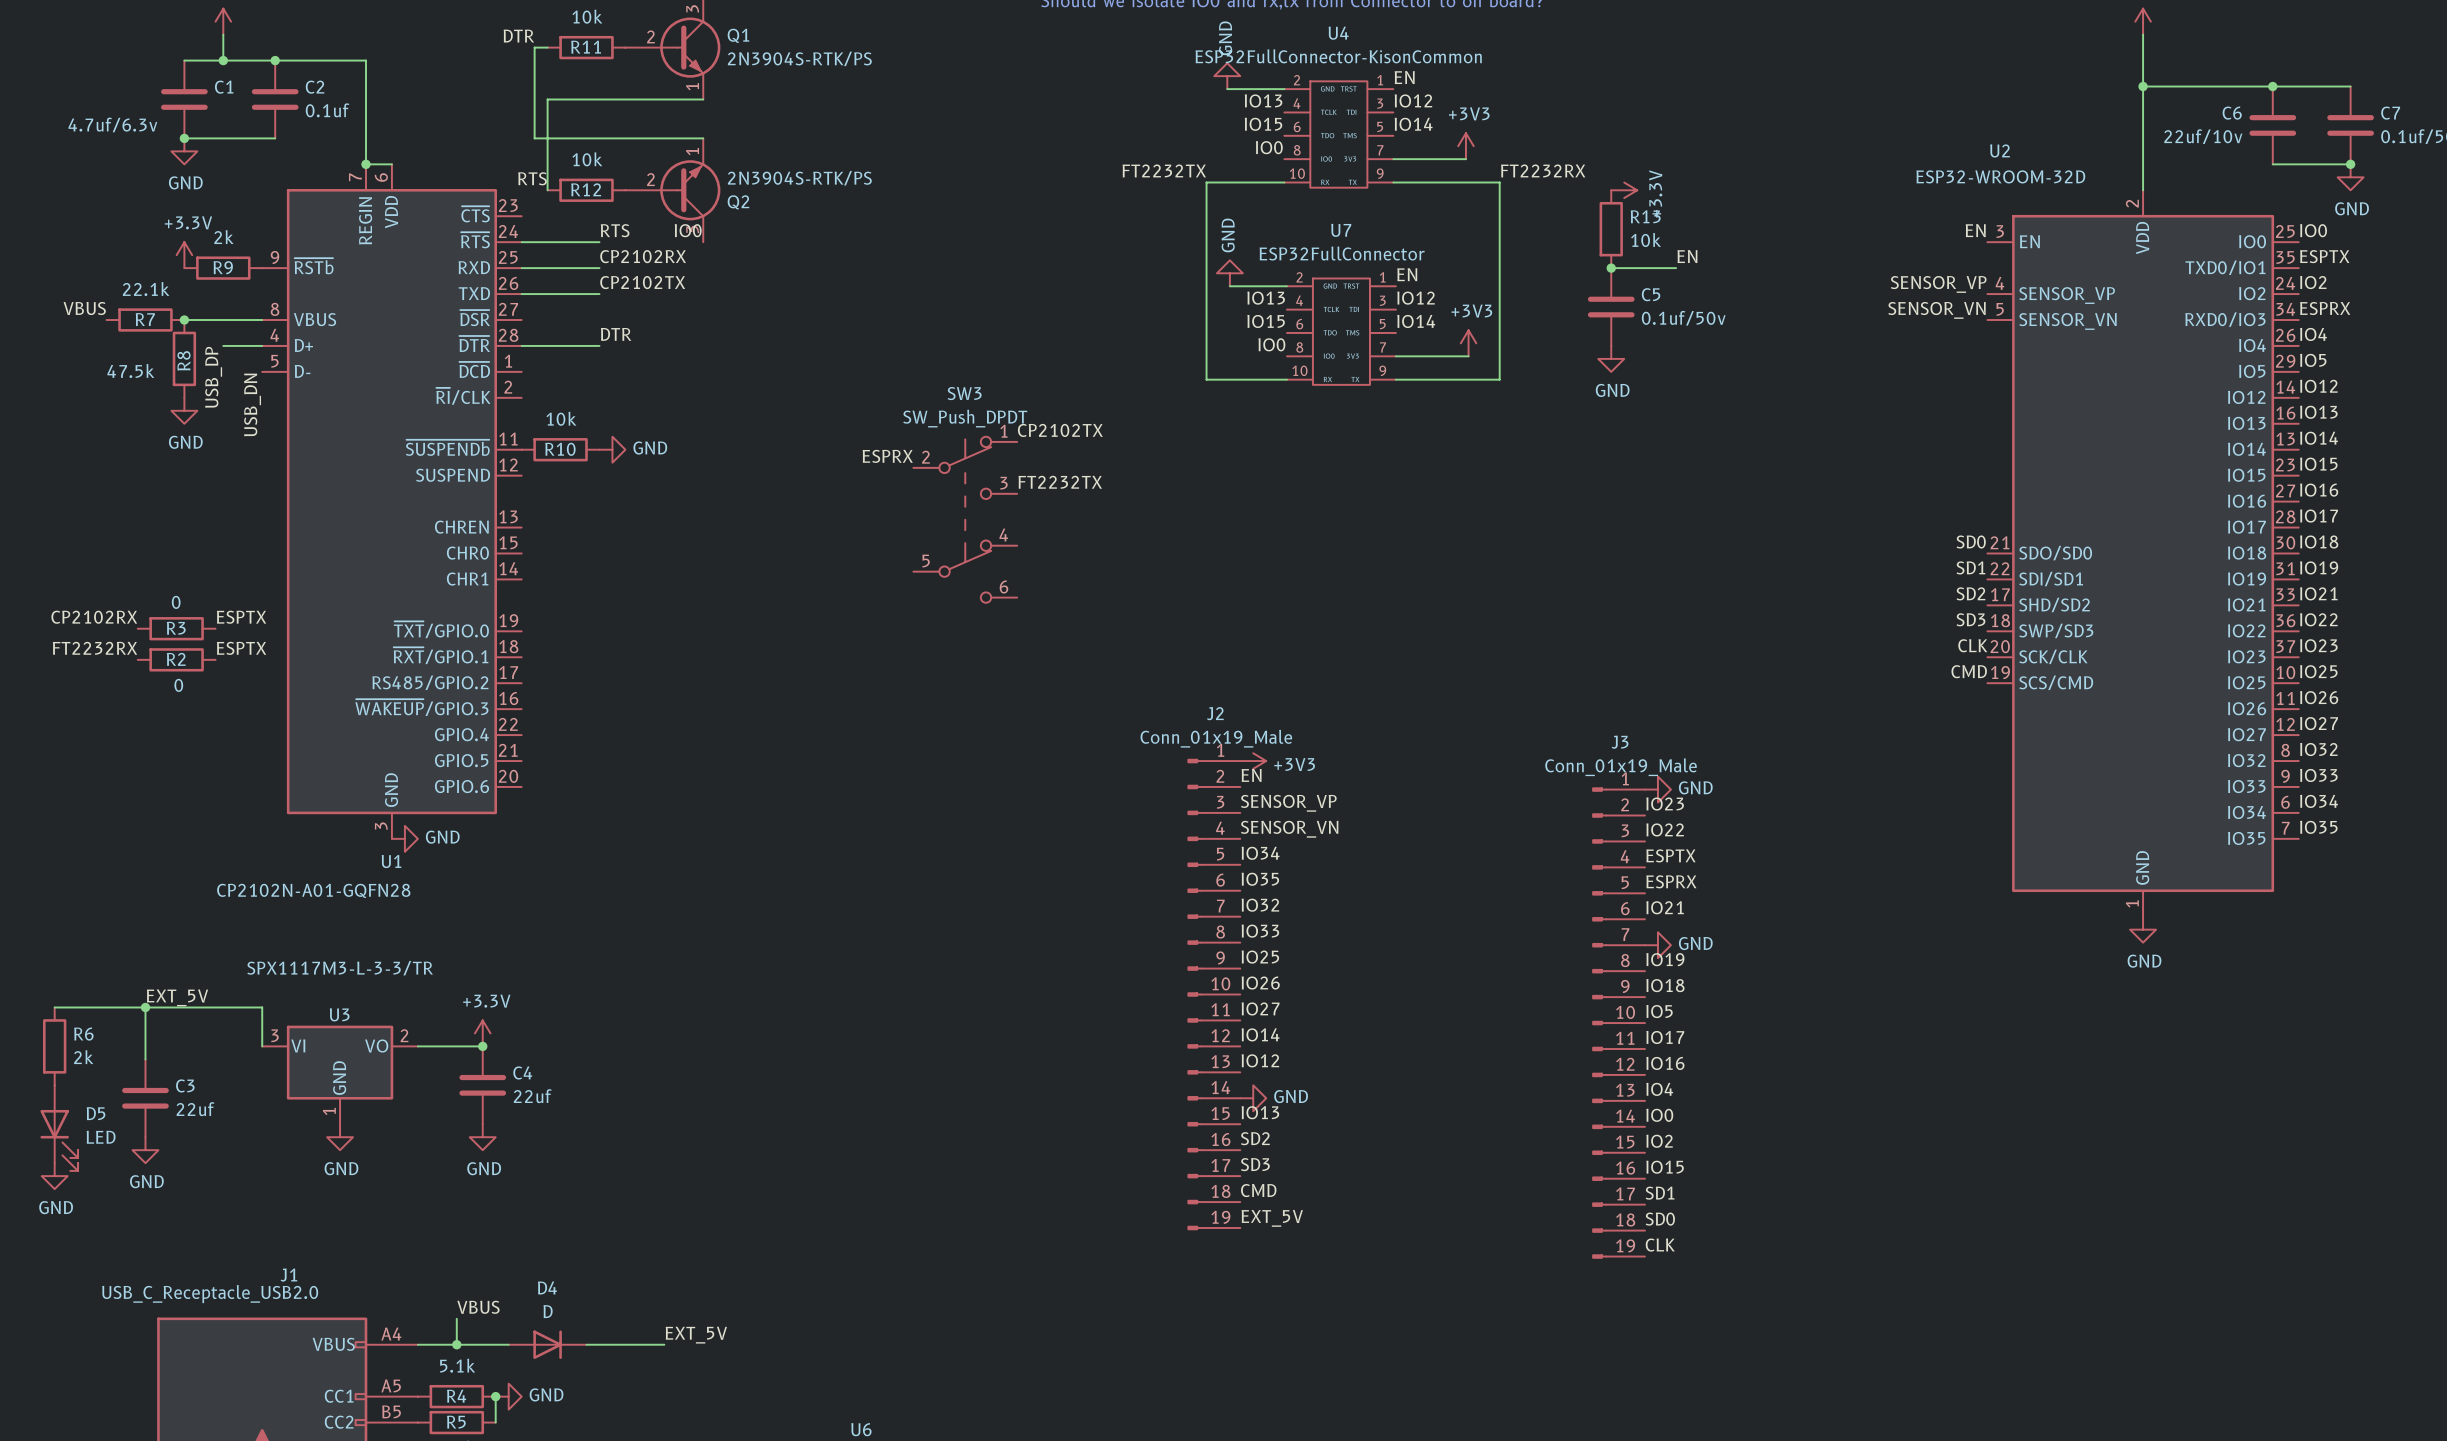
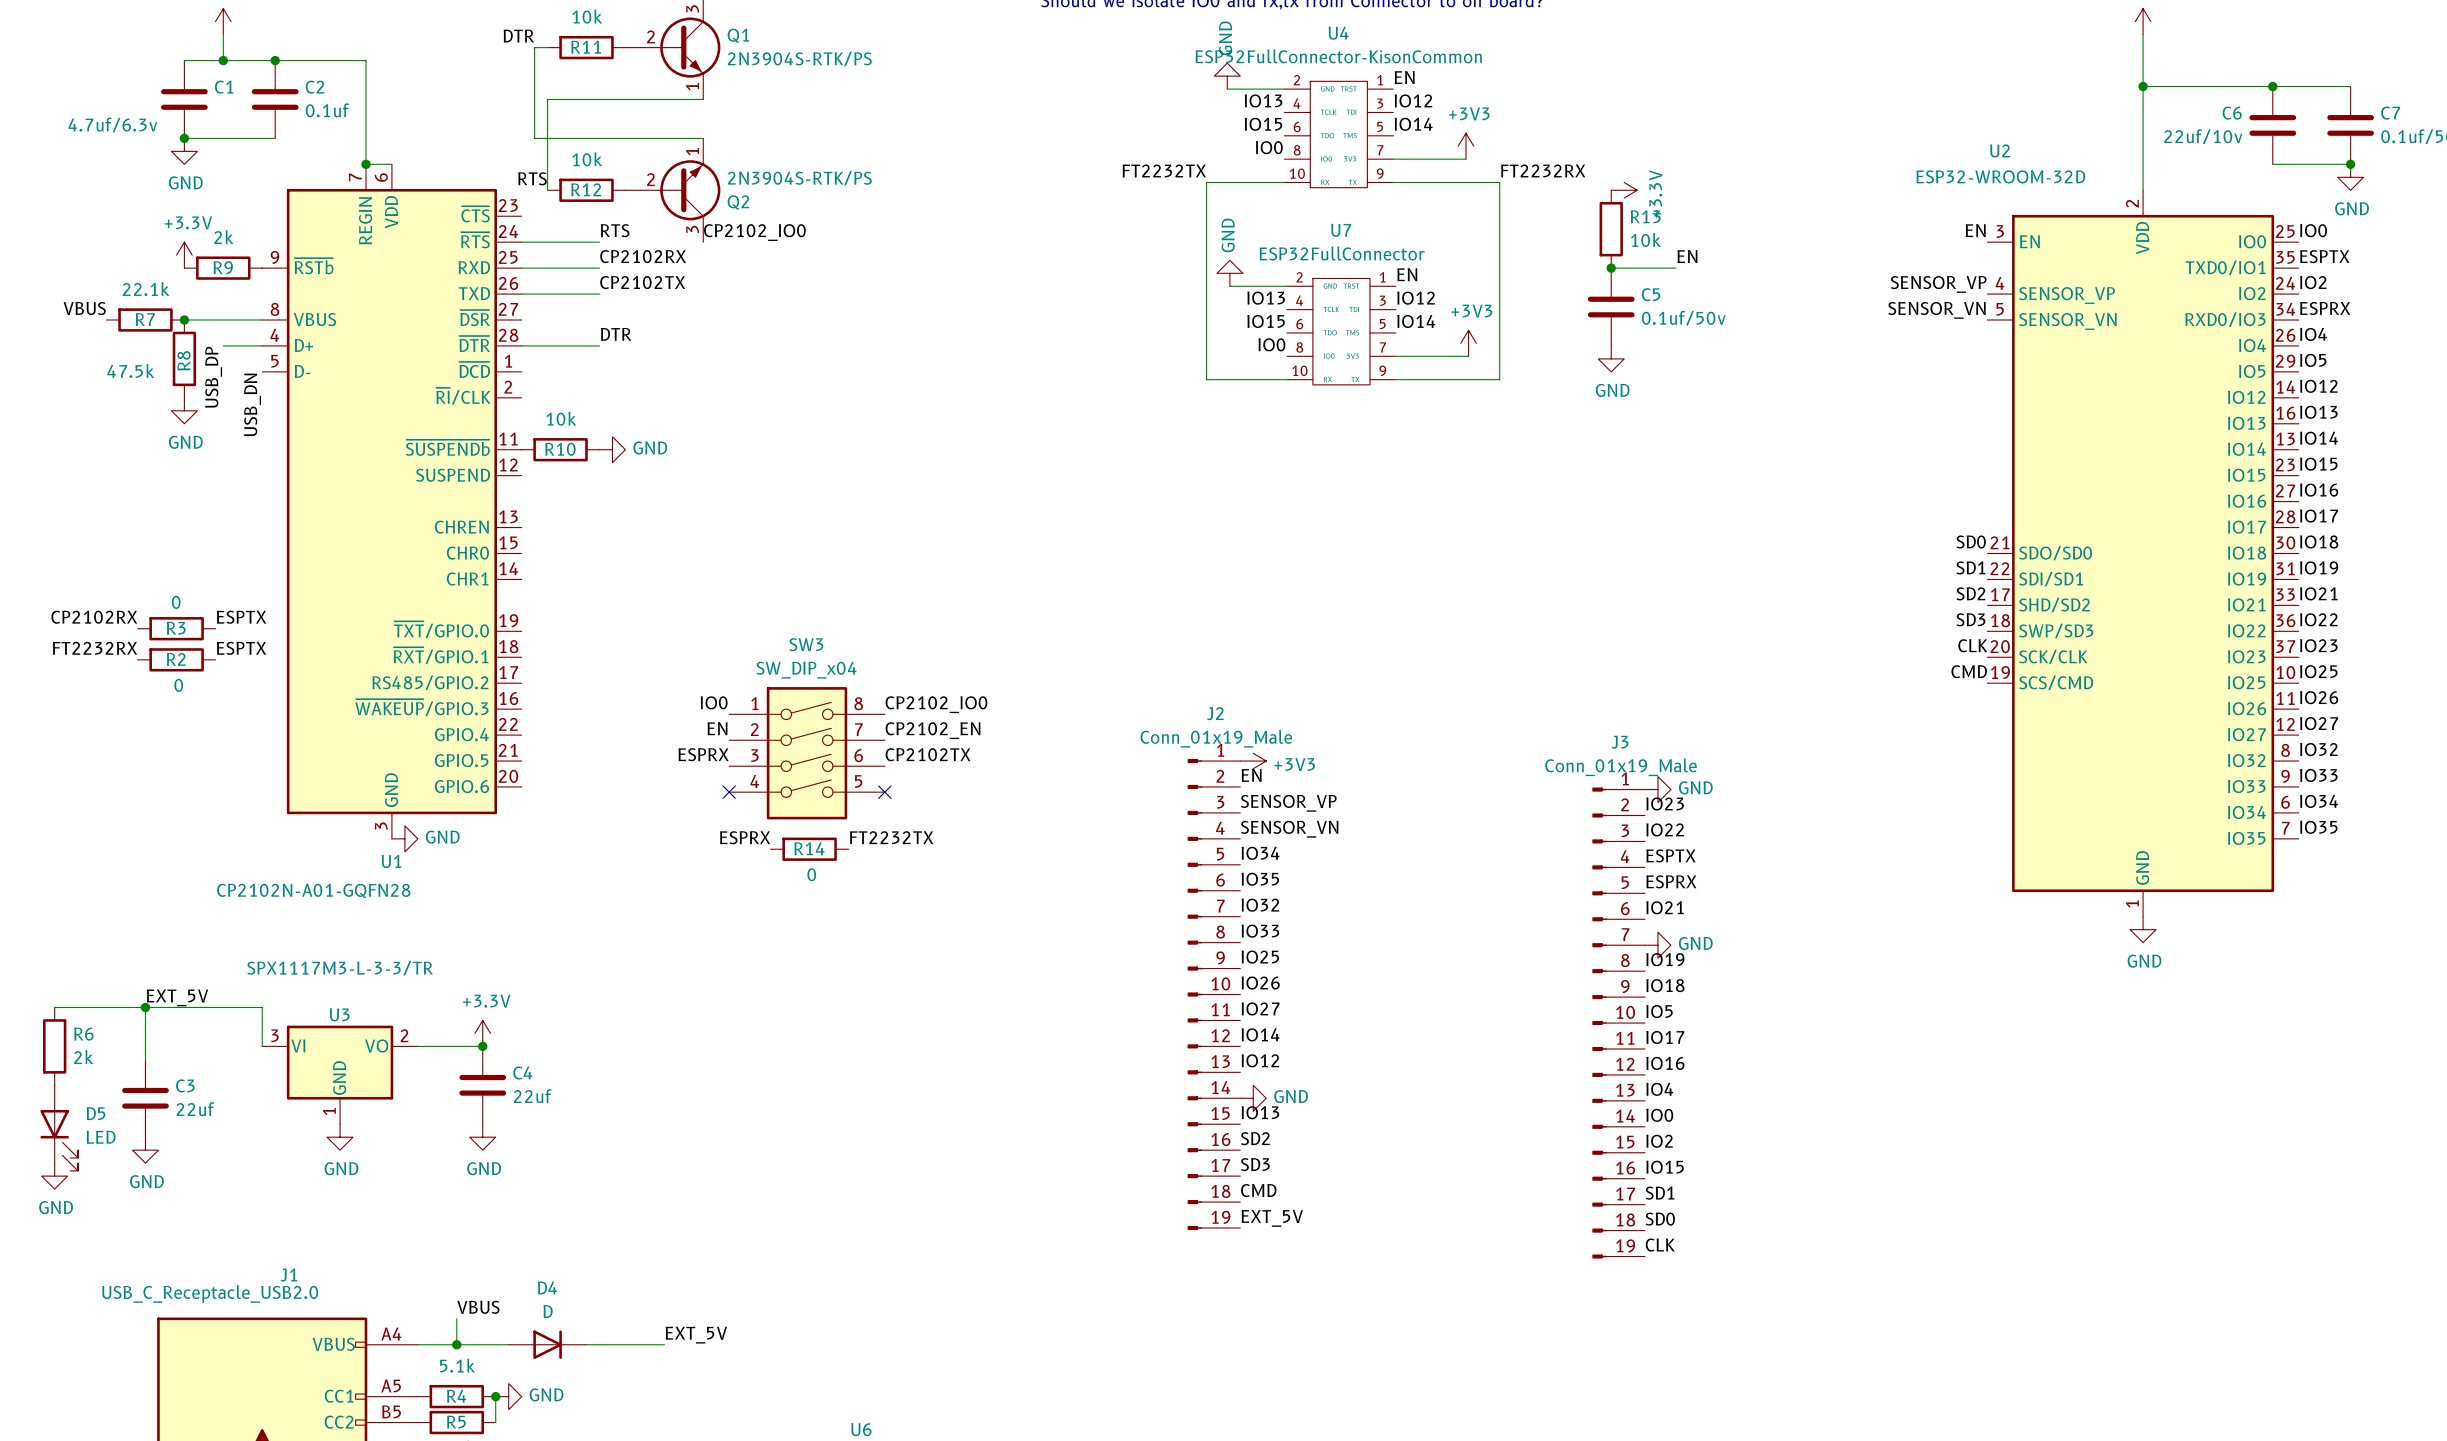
label: IO0 (688, 230) -> CP2102_IO0 (754, 232)
SW3 value: SW_Push_DPDT (965, 418) -> SW_DIP_x04 (806, 670)
label: CP2102TX (1060, 430) -> none
SW3 symbol: [913, 436, 1018, 603] -> [729, 687, 885, 820]
label: ESPRX (887, 456) -> none
label: FT2232TX (1060, 482) -> none
label: none -> IO0 (714, 702)
label: none -> CP2102_IO0 (936, 704)
label: none -> EN (717, 728)
label: none -> CP2102_EN (933, 730)
label: none -> ESPRX (703, 754)
label: none -> CP2102TX (928, 754)
no-connect mark: none -> (729, 792)
no-connect mark: none -> (884, 792)
label: none -> ESPRX (745, 837)
label: none -> FT2232TX (891, 837)
R14: none -> 0 (809, 849)

